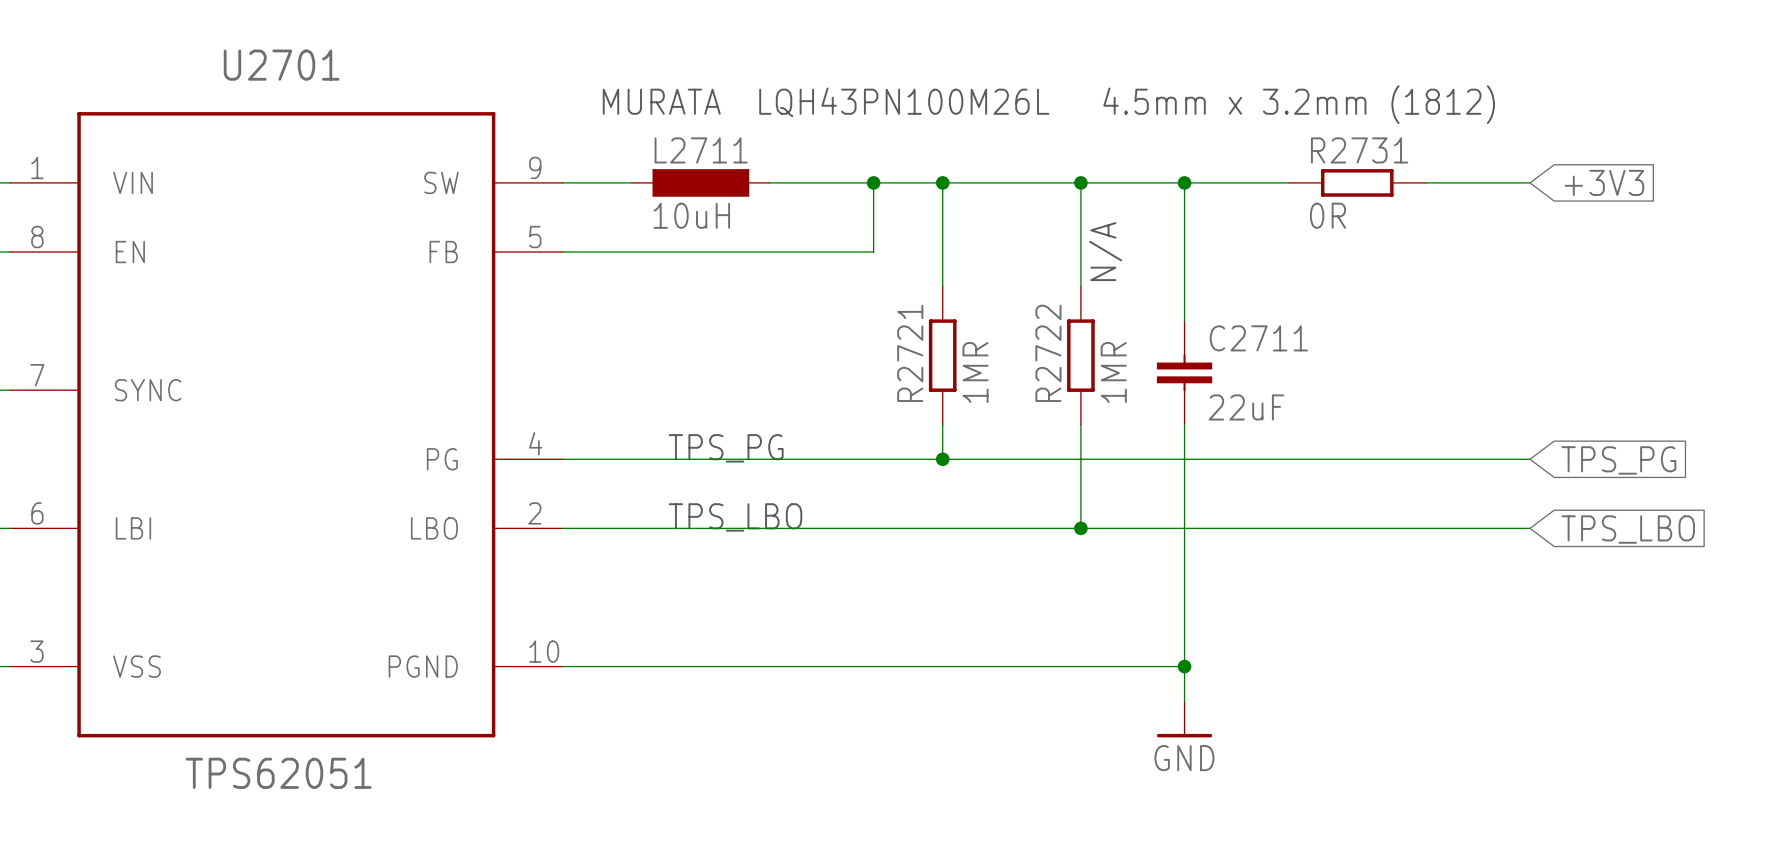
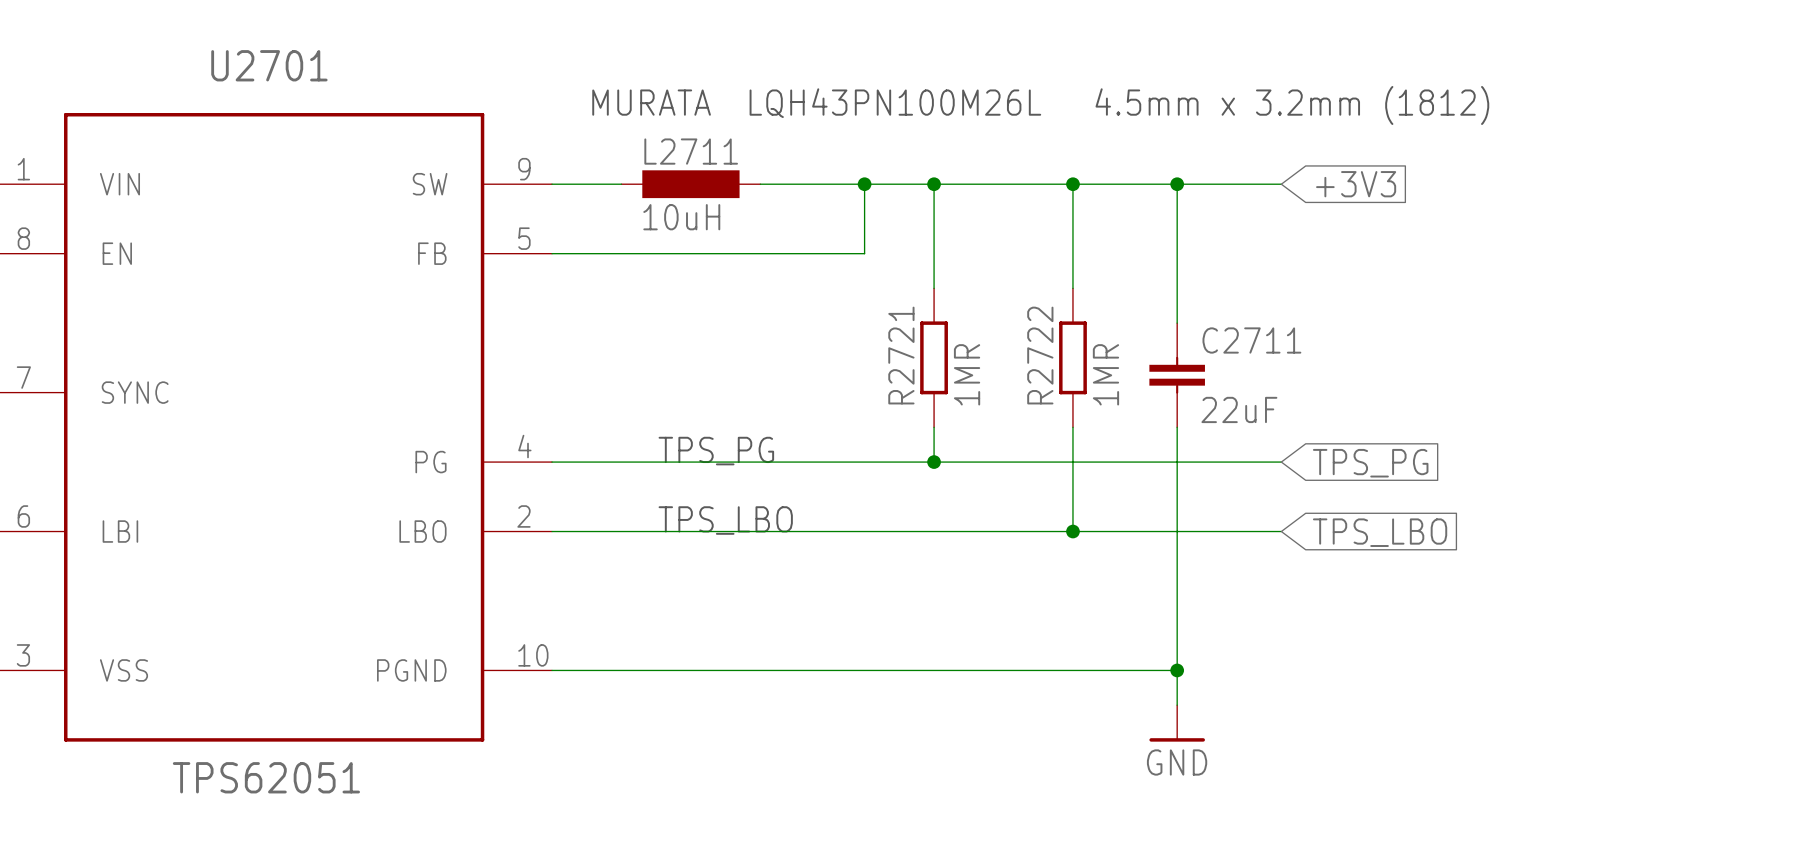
R2731: 0R (1357, 182) -> none
wire: (1426, 182) (1530, 182) -> none
global label position: +3V3 (1604, 182) -> +3V3 (1356, 184)
text: N/A (1105, 251) -> none
wire: (1288, 459) (1530, 459) -> none
global label position: TPS_PG (1618, 460) -> TPS_PG (1370, 463)
wire: (1288, 528) (1530, 528) -> none
global label position: TPS_LBO (1628, 529) -> TPS_LBO (1380, 532)

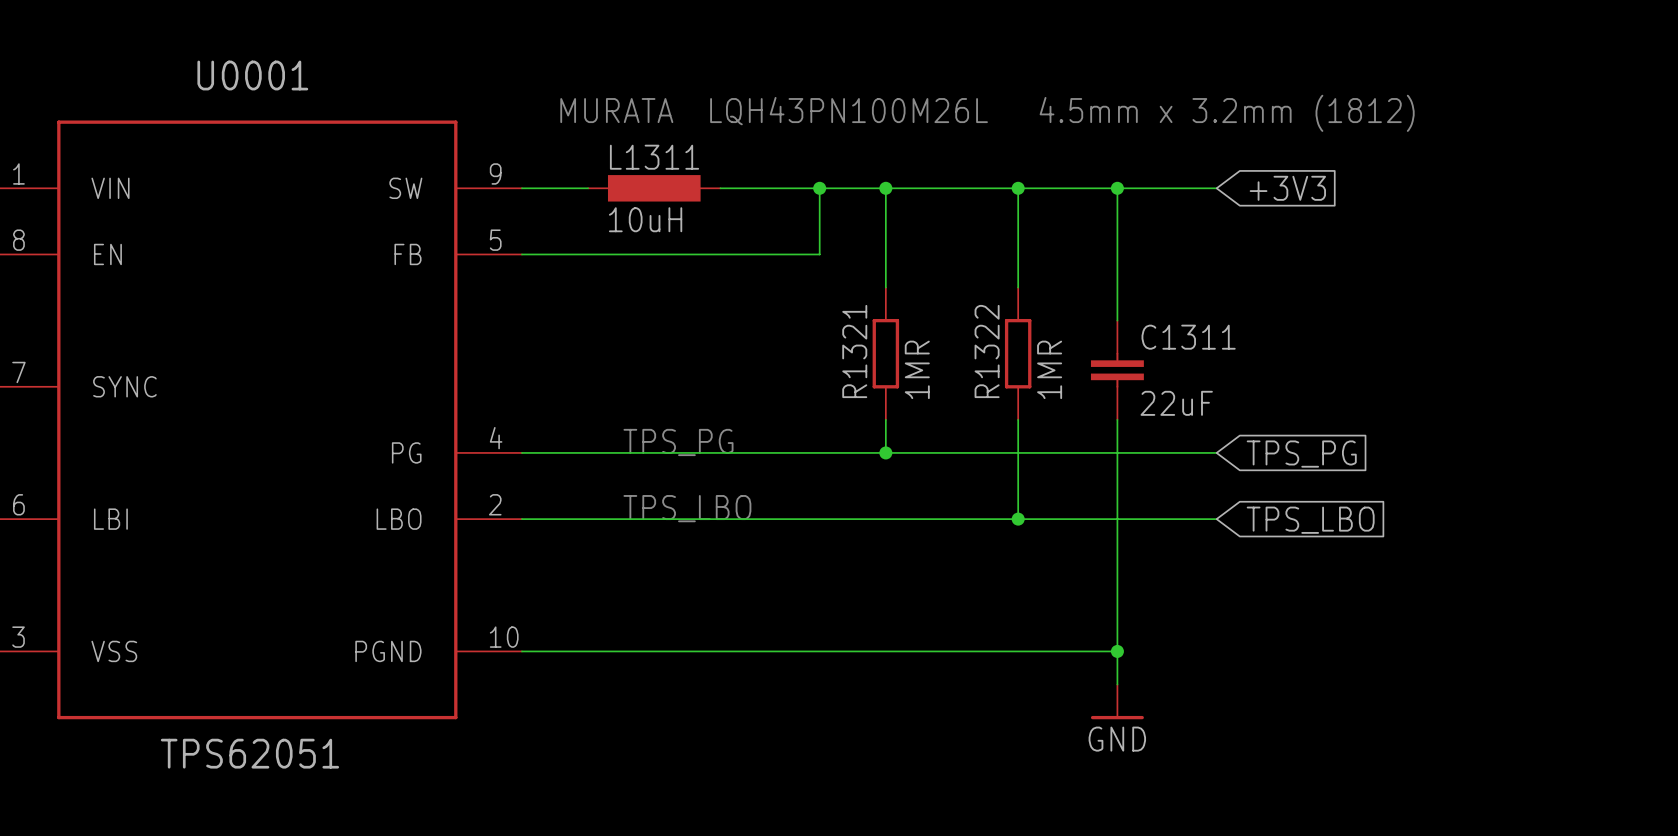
U2701 name: U2701 (269, 65) -> U0001 (252, 75)
L2711 name: L2711 (691, 151) -> L1311 (654, 157)
C2711 name: C2711 (1251, 340) -> C1311 (1188, 337)
R2721 name: R2721 (901, 355) -> R1321 (854, 351)
R2722 name: R2722 (1040, 355) -> R1322 (987, 351)

